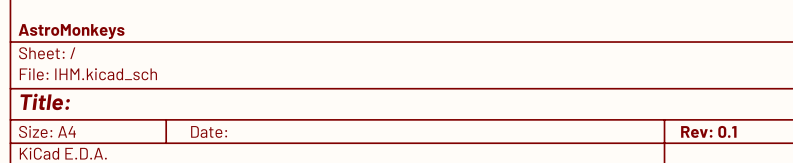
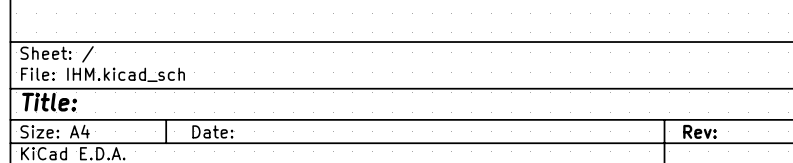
title block: AstroMonkeys (71, 31) -> none
title block: Rev: 0.1 (708, 131) -> Rev: (699, 131)

